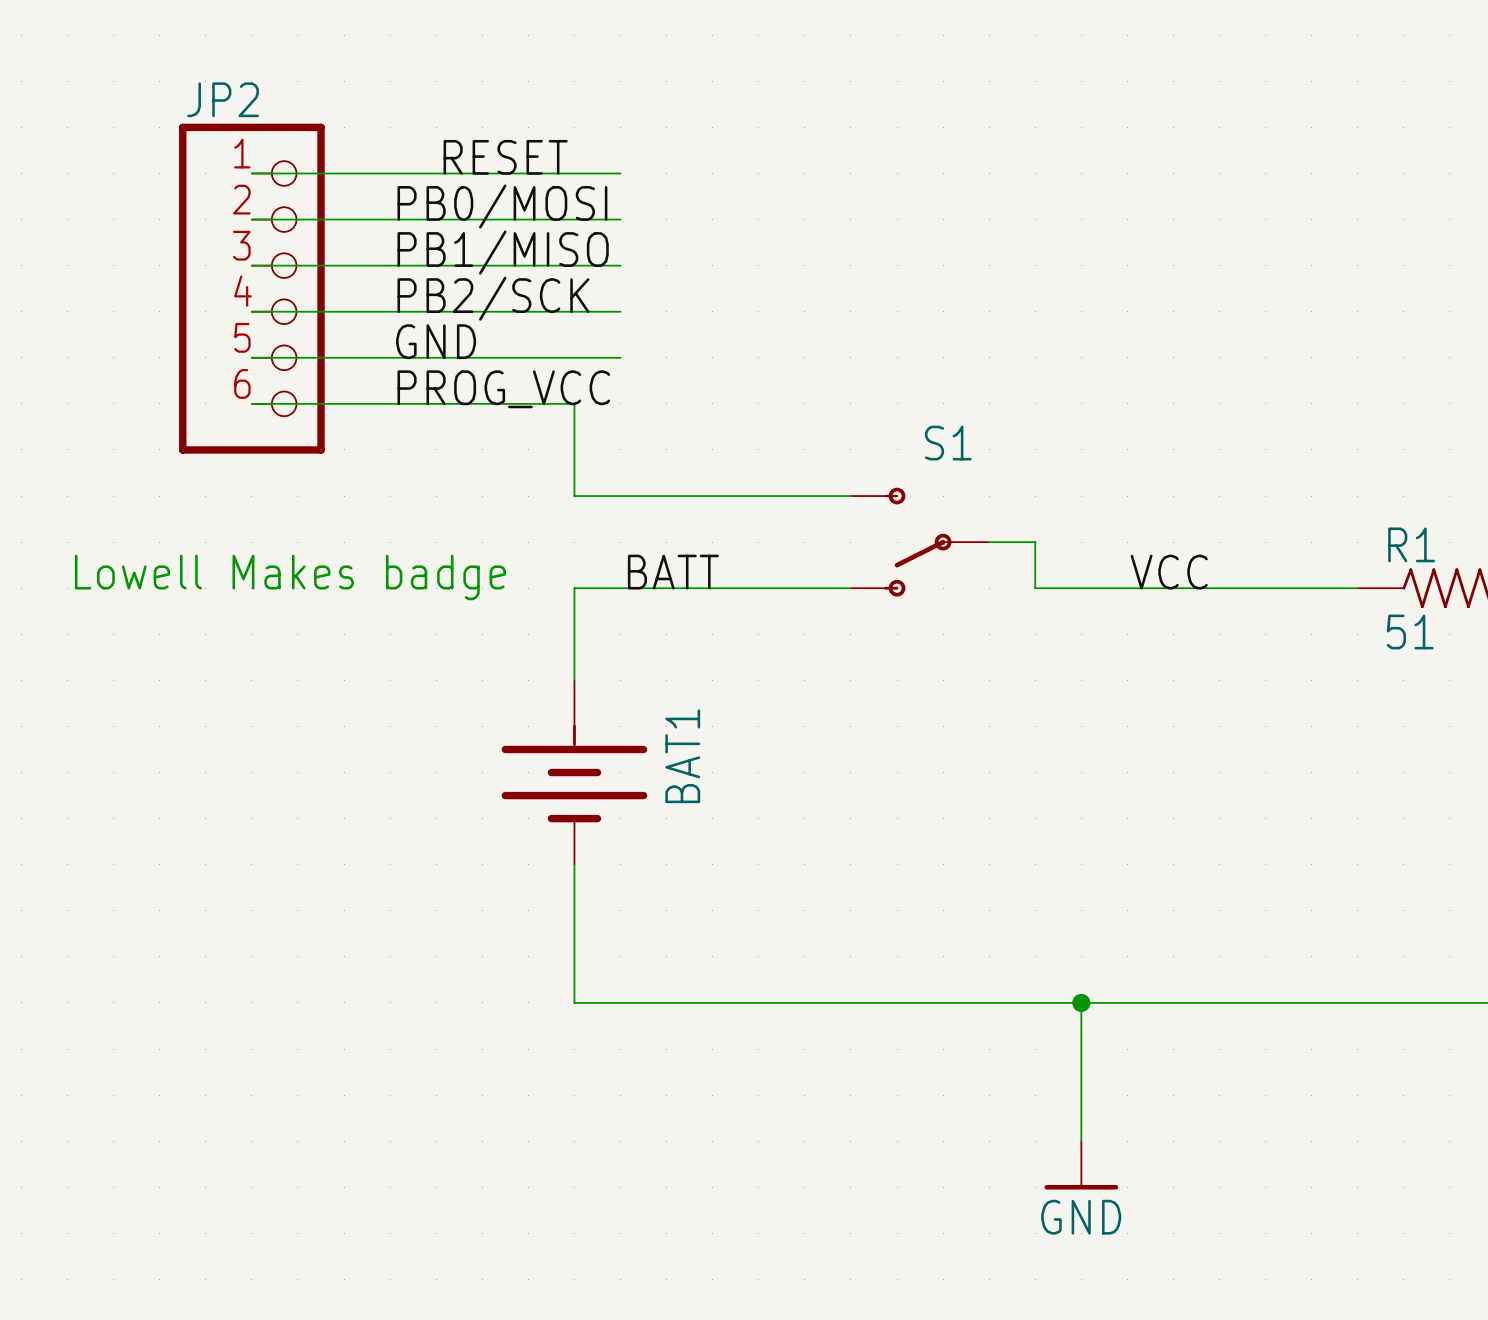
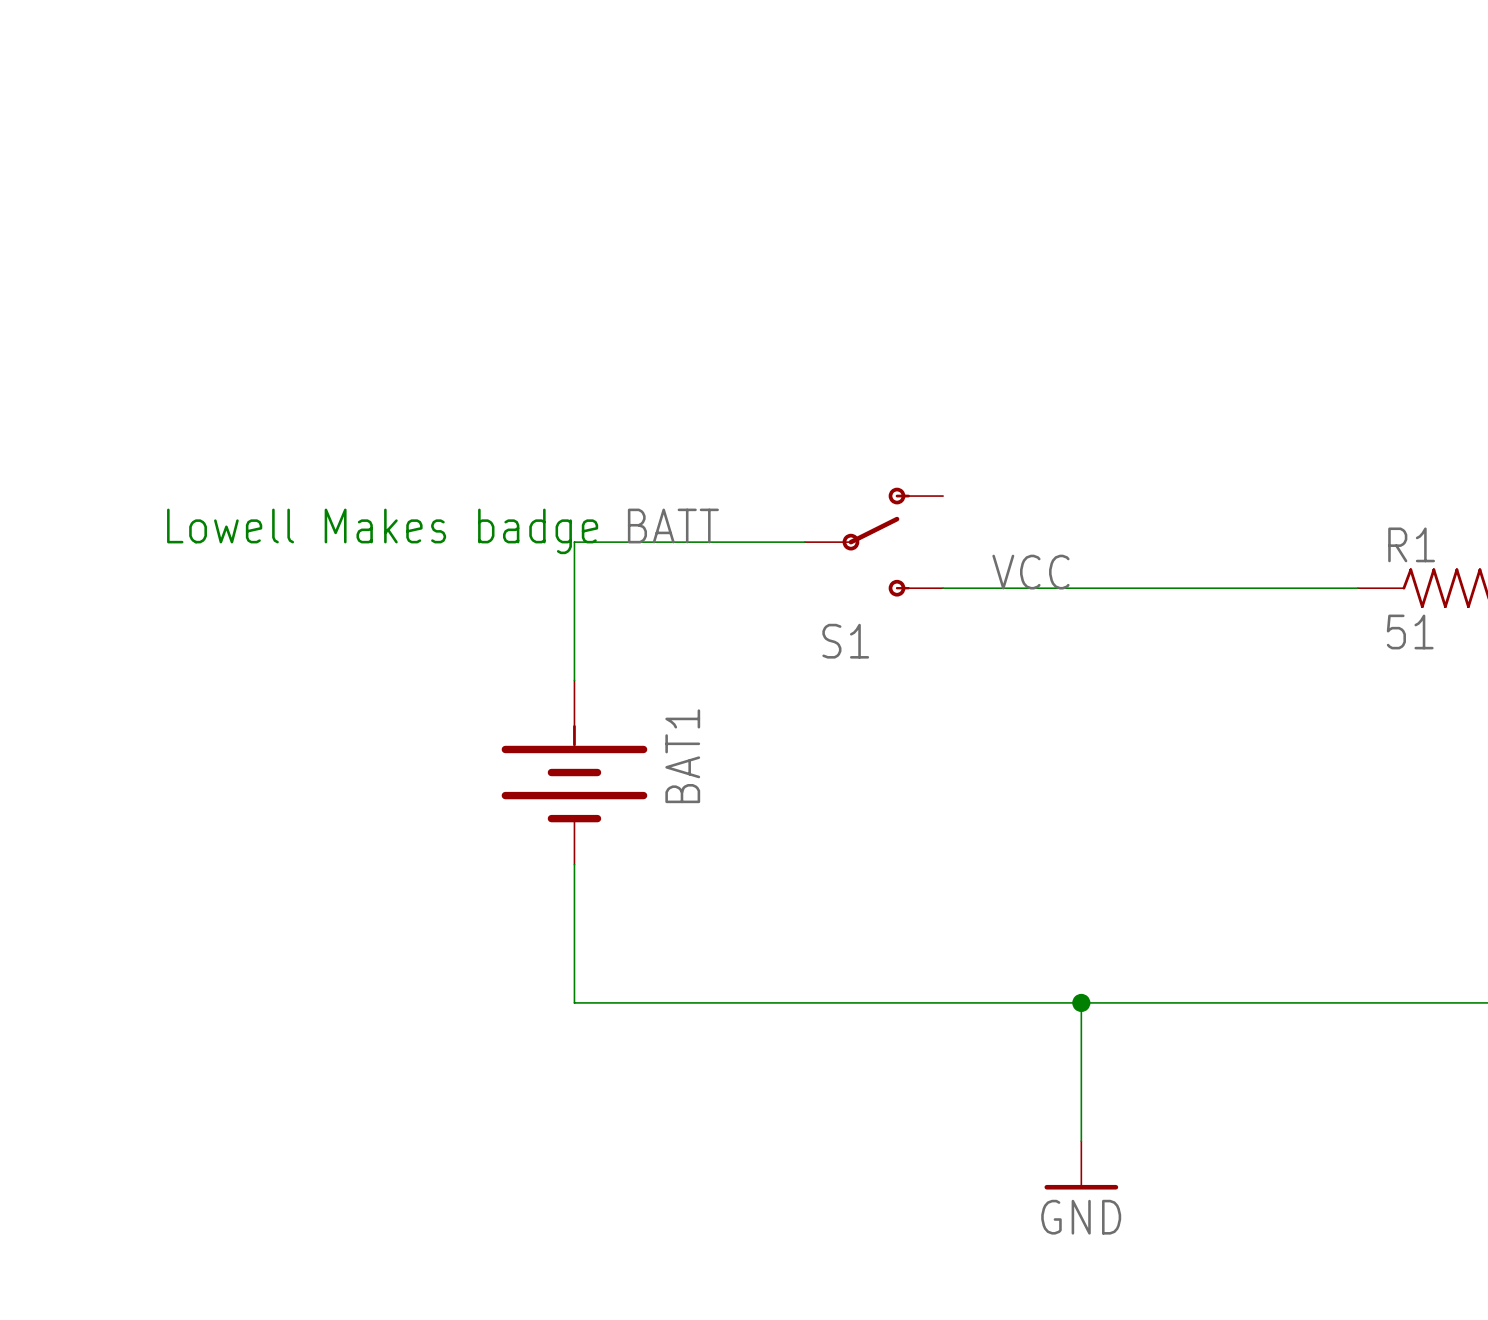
label: RESET (505, 157) -> none
wire: (251, 173) (620, 173) -> none
label: PB0/MOSI (502, 206) -> none
wire: (251, 219) (620, 219) -> none
label: PB1/MISO (503, 252) -> none
wire: (251, 265) (620, 265) -> none
JP2: (251, 288) -> none
label: PB2/SCK (493, 298) -> none
wire: (251, 311) (620, 311) -> none
label: GND (436, 341) -> none
wire: (251, 357) (620, 357) -> none
label: PROG_VCC (503, 389) -> none
wire: (251, 403) (574, 403) (574, 496) (850, 496) -> none
S1 rotation: 0° (917, 542) -> 180° (876, 542)
wire: (989, 542) (1035, 542) (1035, 588) -> (943, 588) (1035, 588)
label position: BATT (673, 572) -> BATT (673, 526)
label position: VCC (1169, 572) -> VCC (1030, 572)
text position: Lowell Makes badge (290, 577) -> Lowell Makes badge (382, 531)
wire: (574, 588) (850, 588) -> (574, 588) (574, 542) (804, 542)

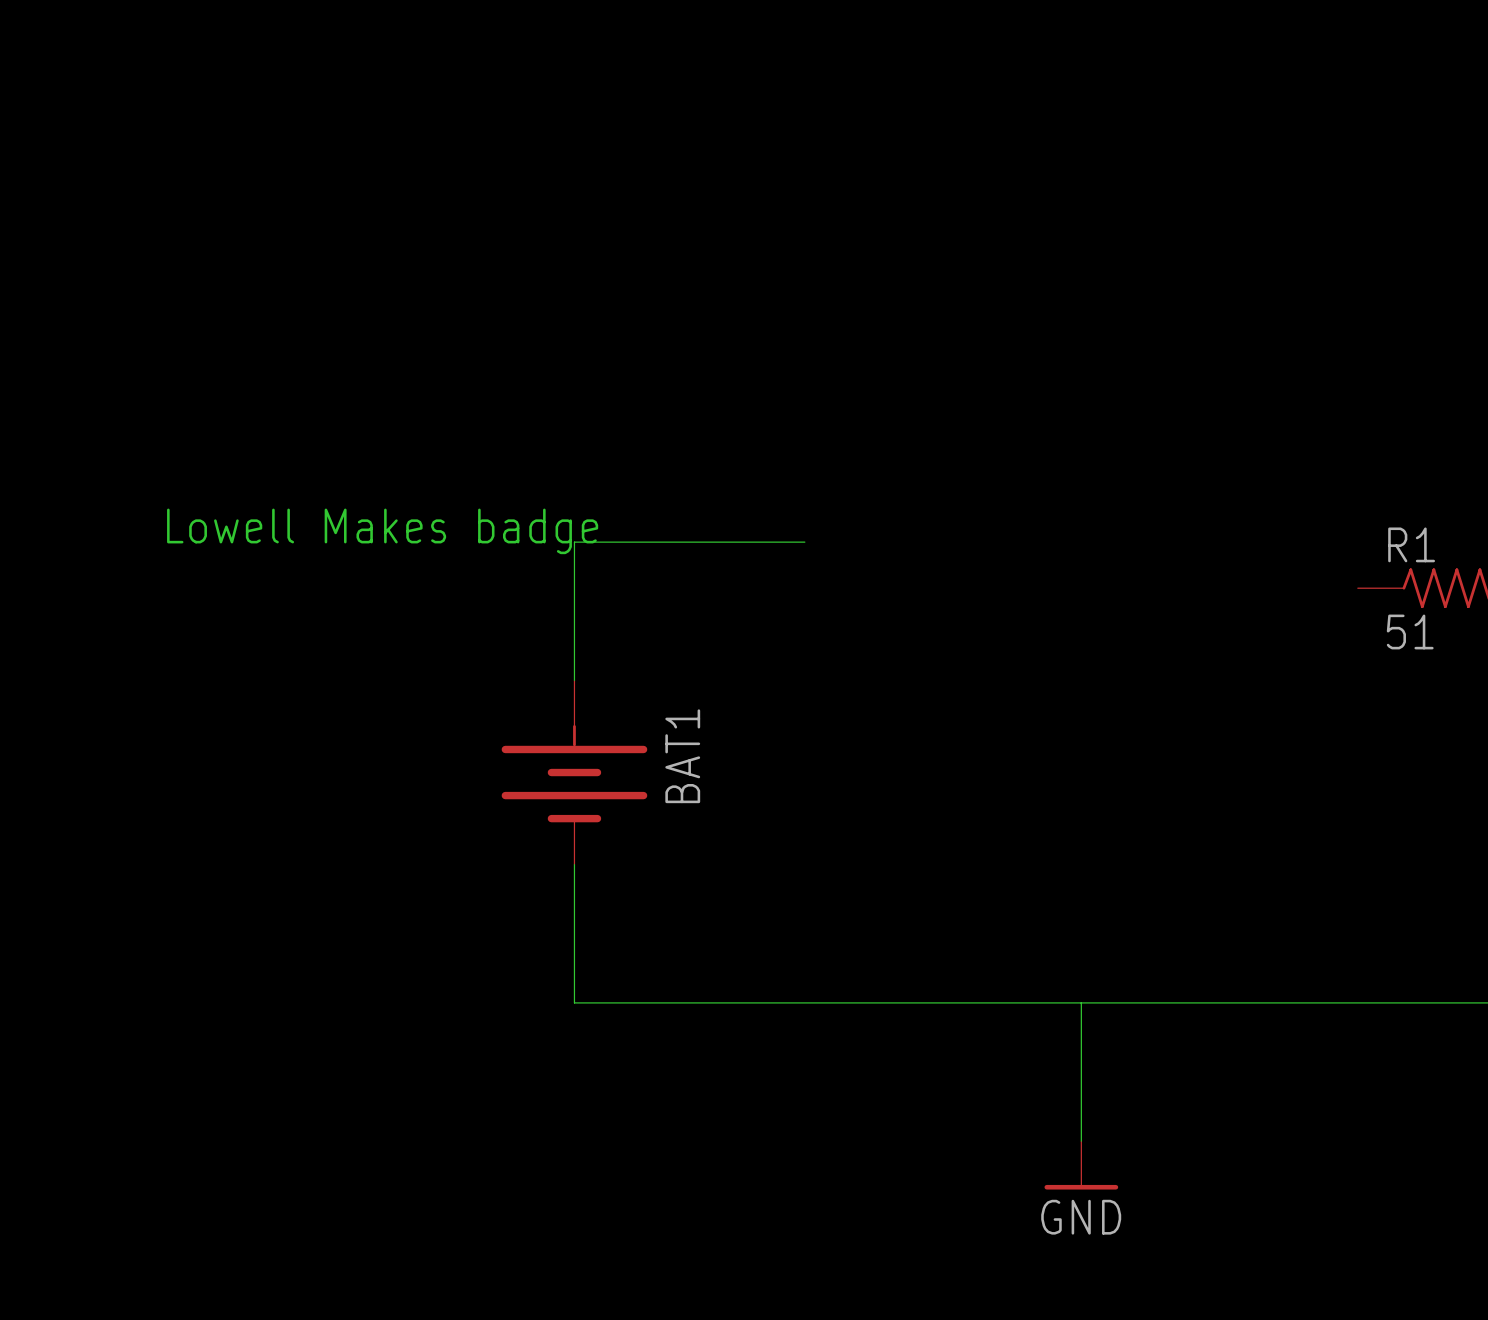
label: BATT (673, 526) -> none
S1: (873, 542) -> none
label: VCC (1030, 572) -> none
wire: (943, 588) (1357, 588) -> none
junction: (1081, 1002) -> none

